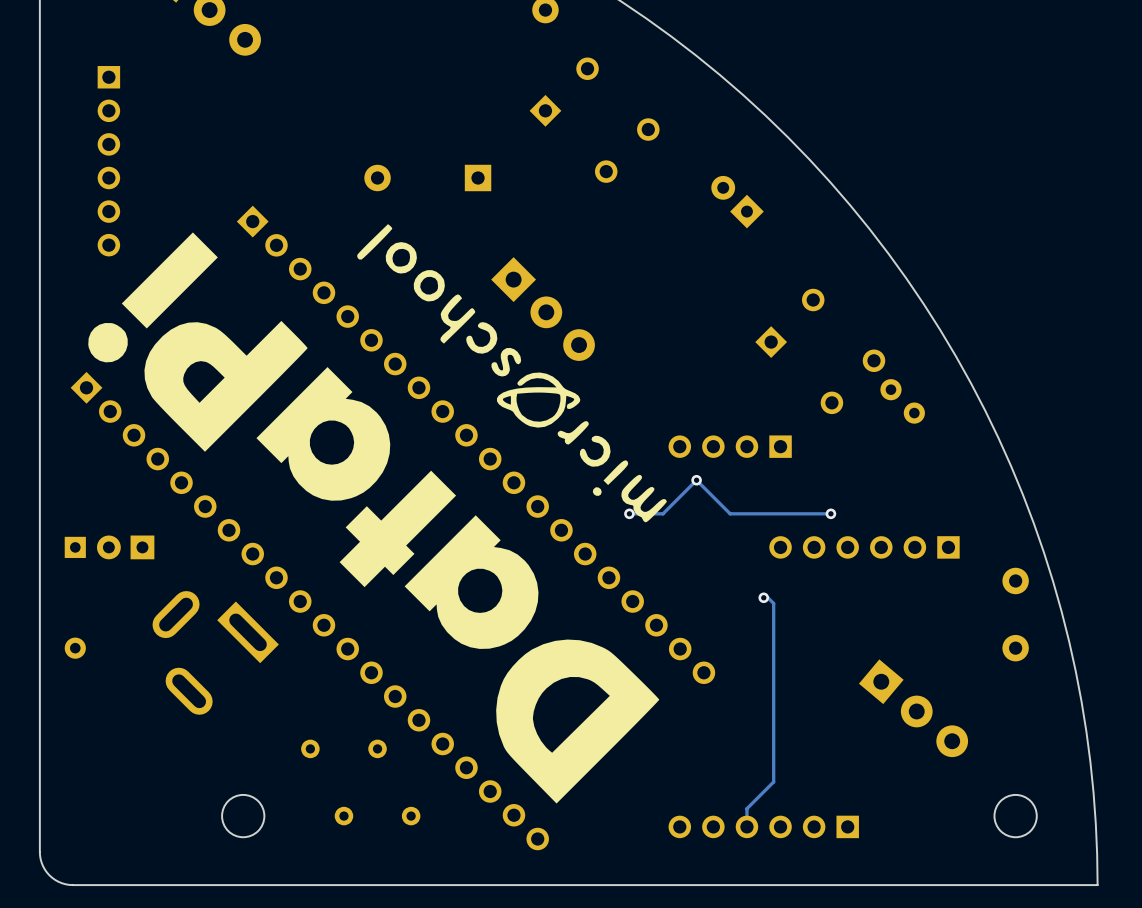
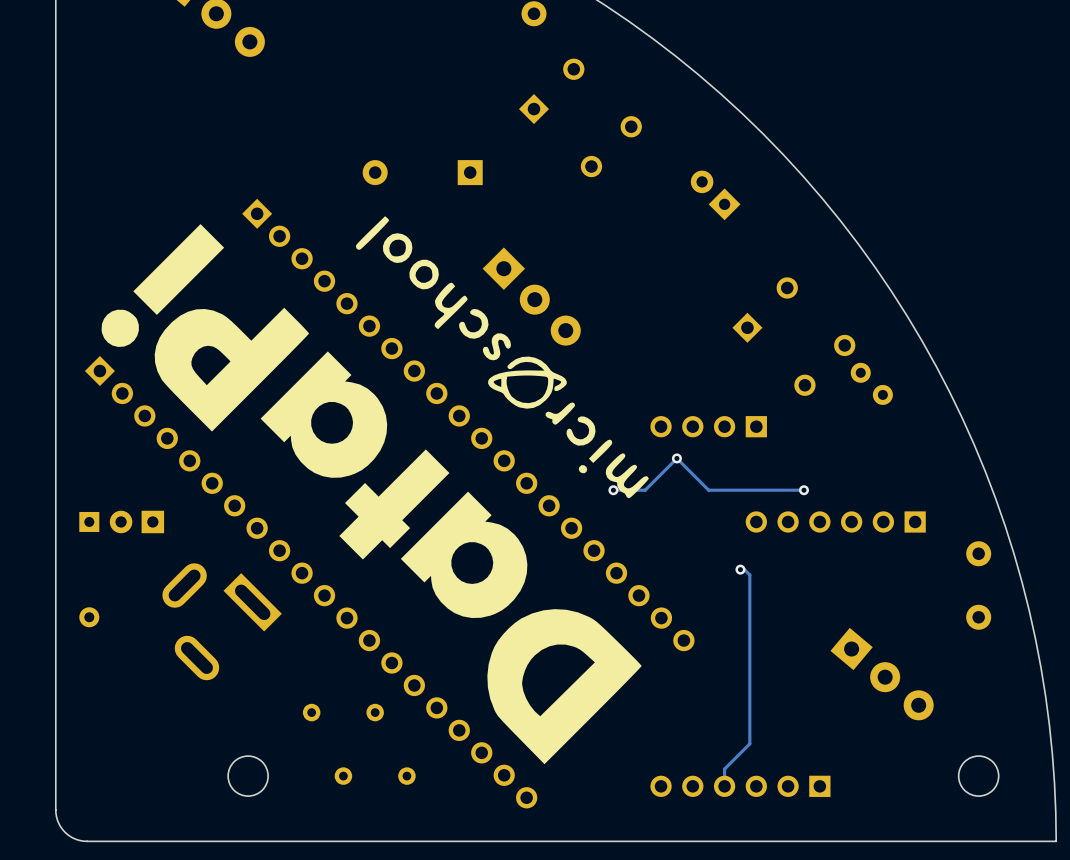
part: (108, 161) -> none

